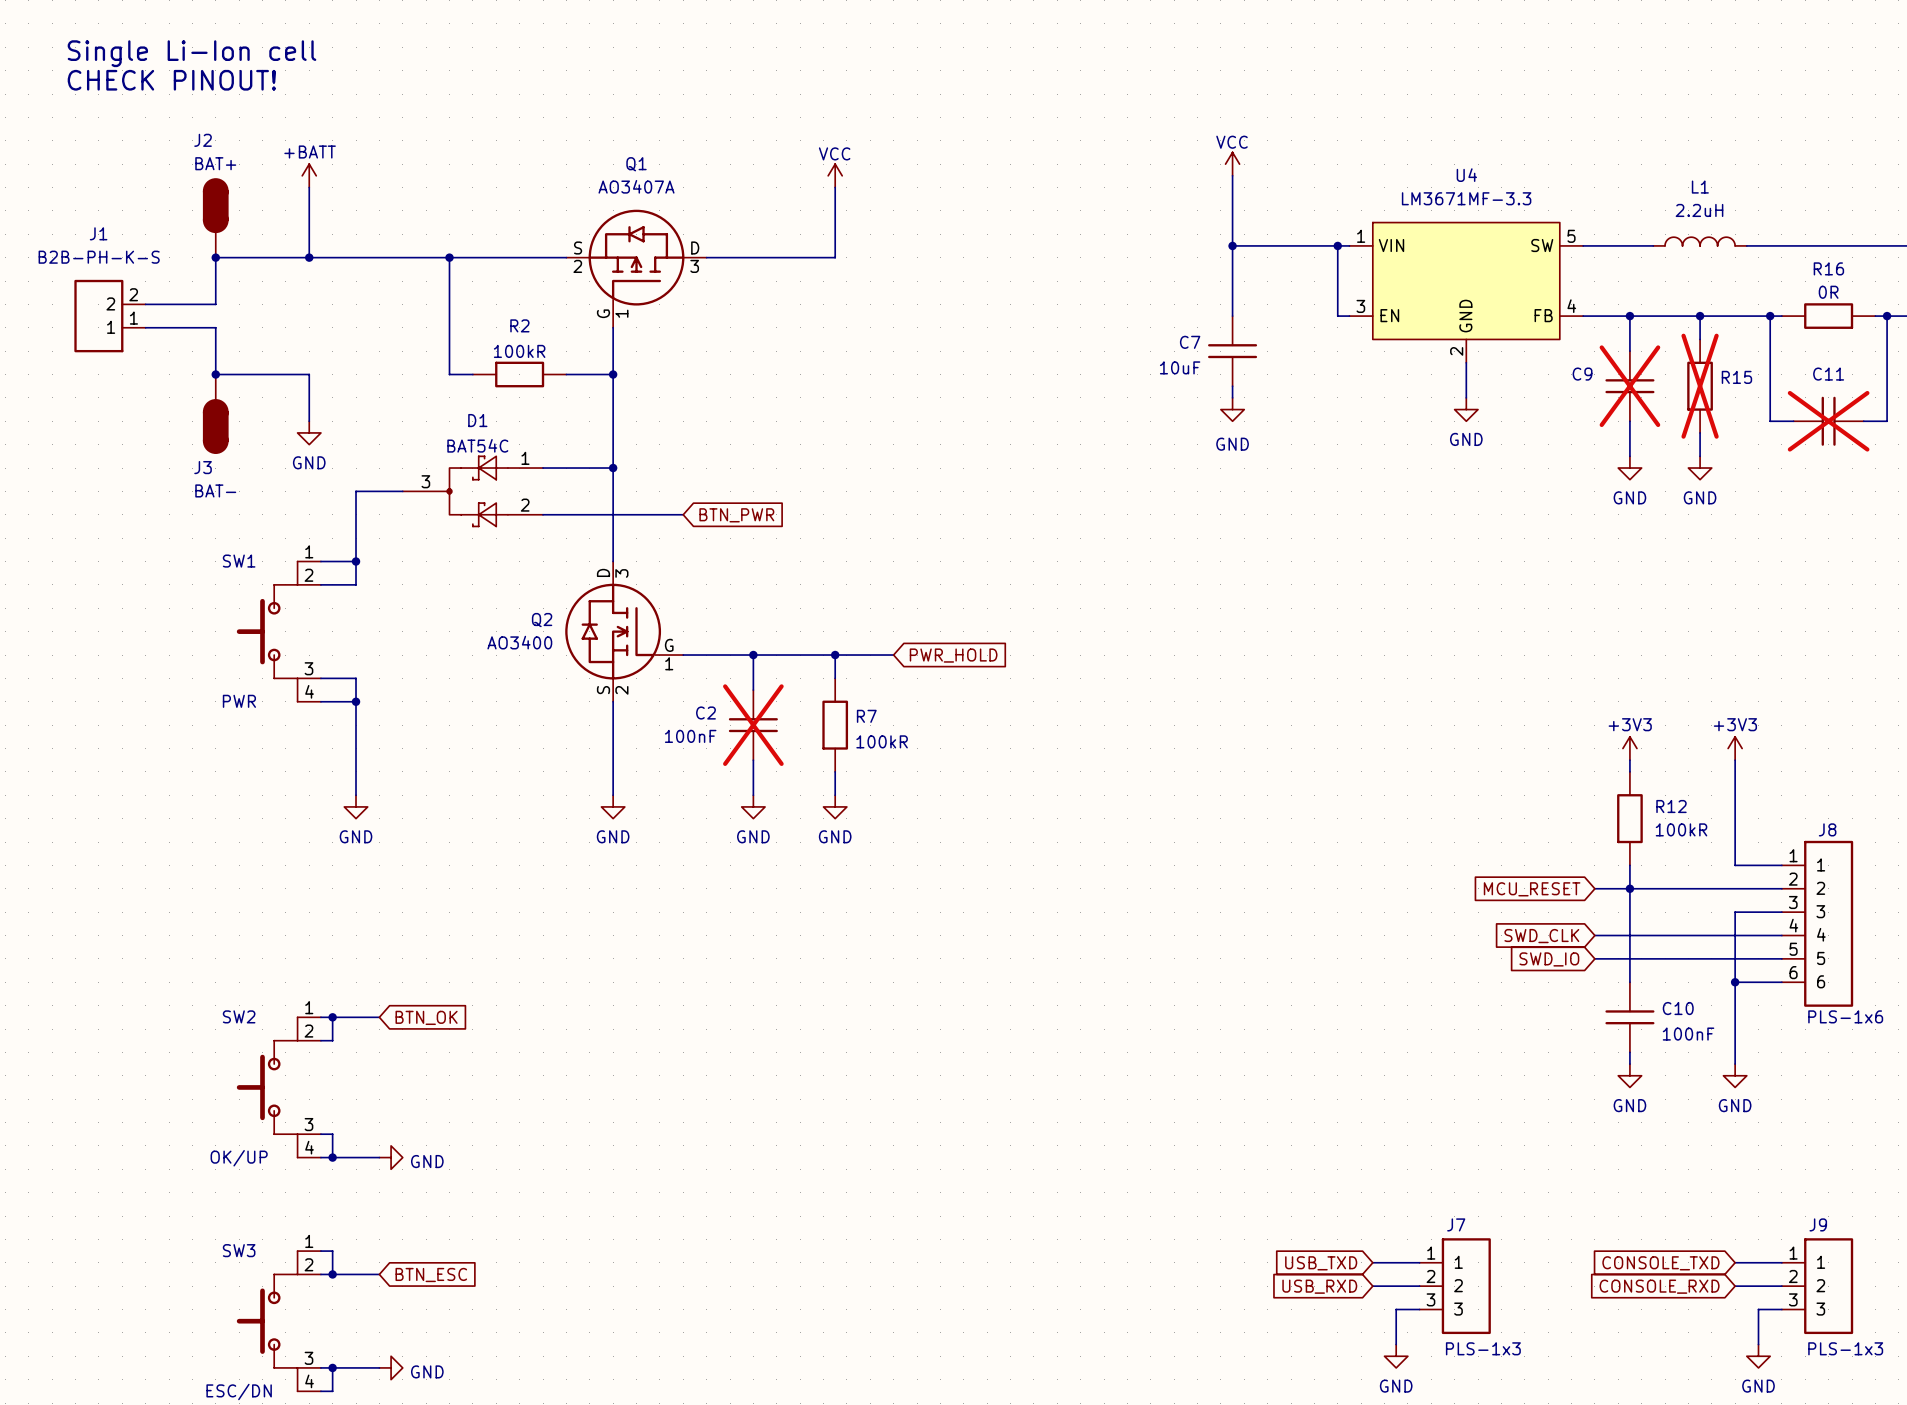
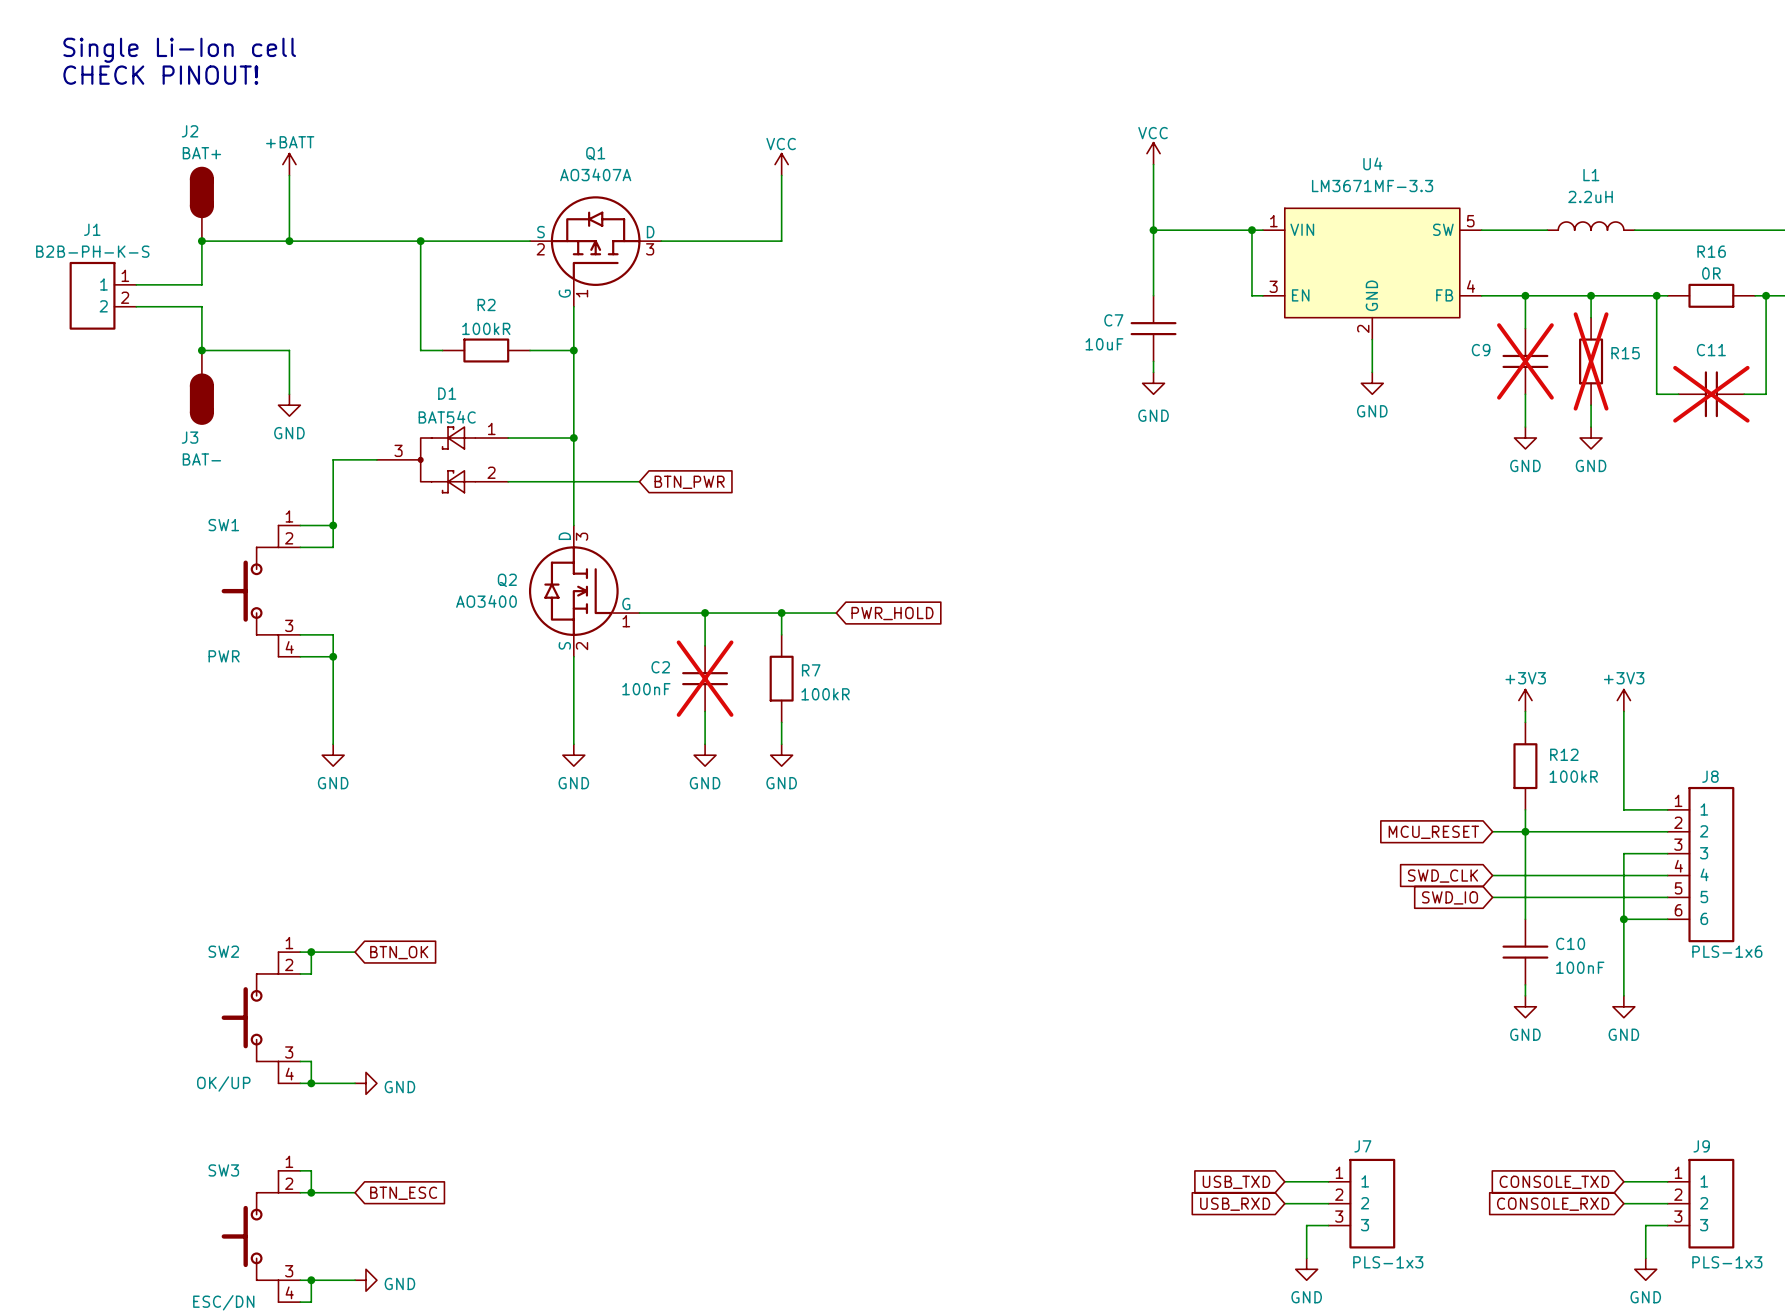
J1 flip: as is (98, 316) -> up-down (92, 295)

